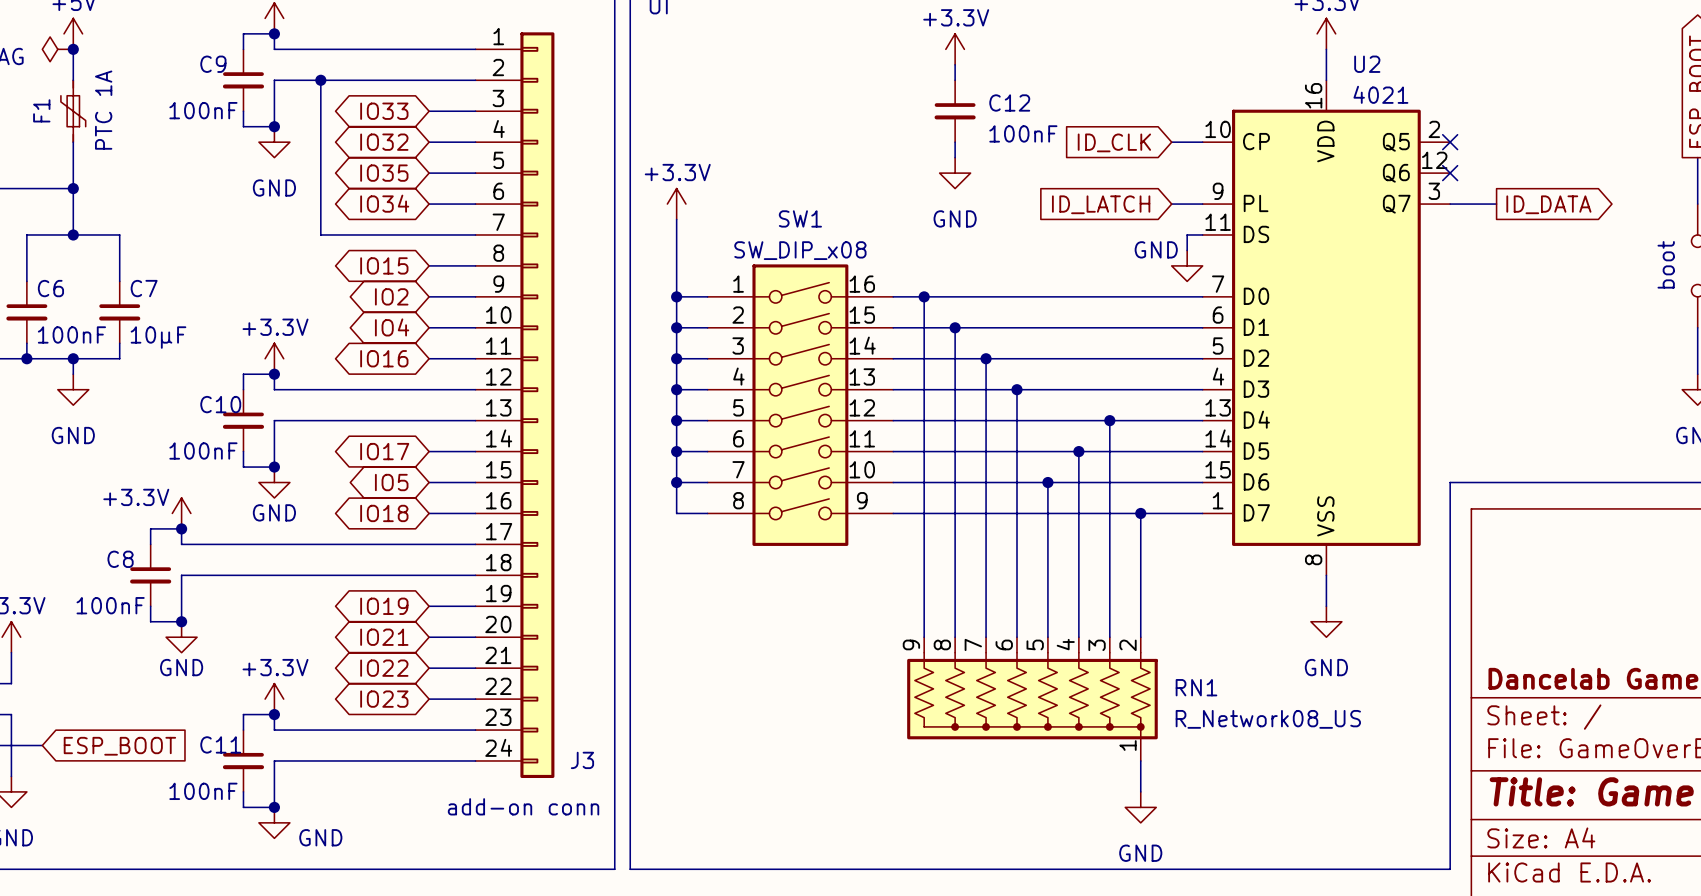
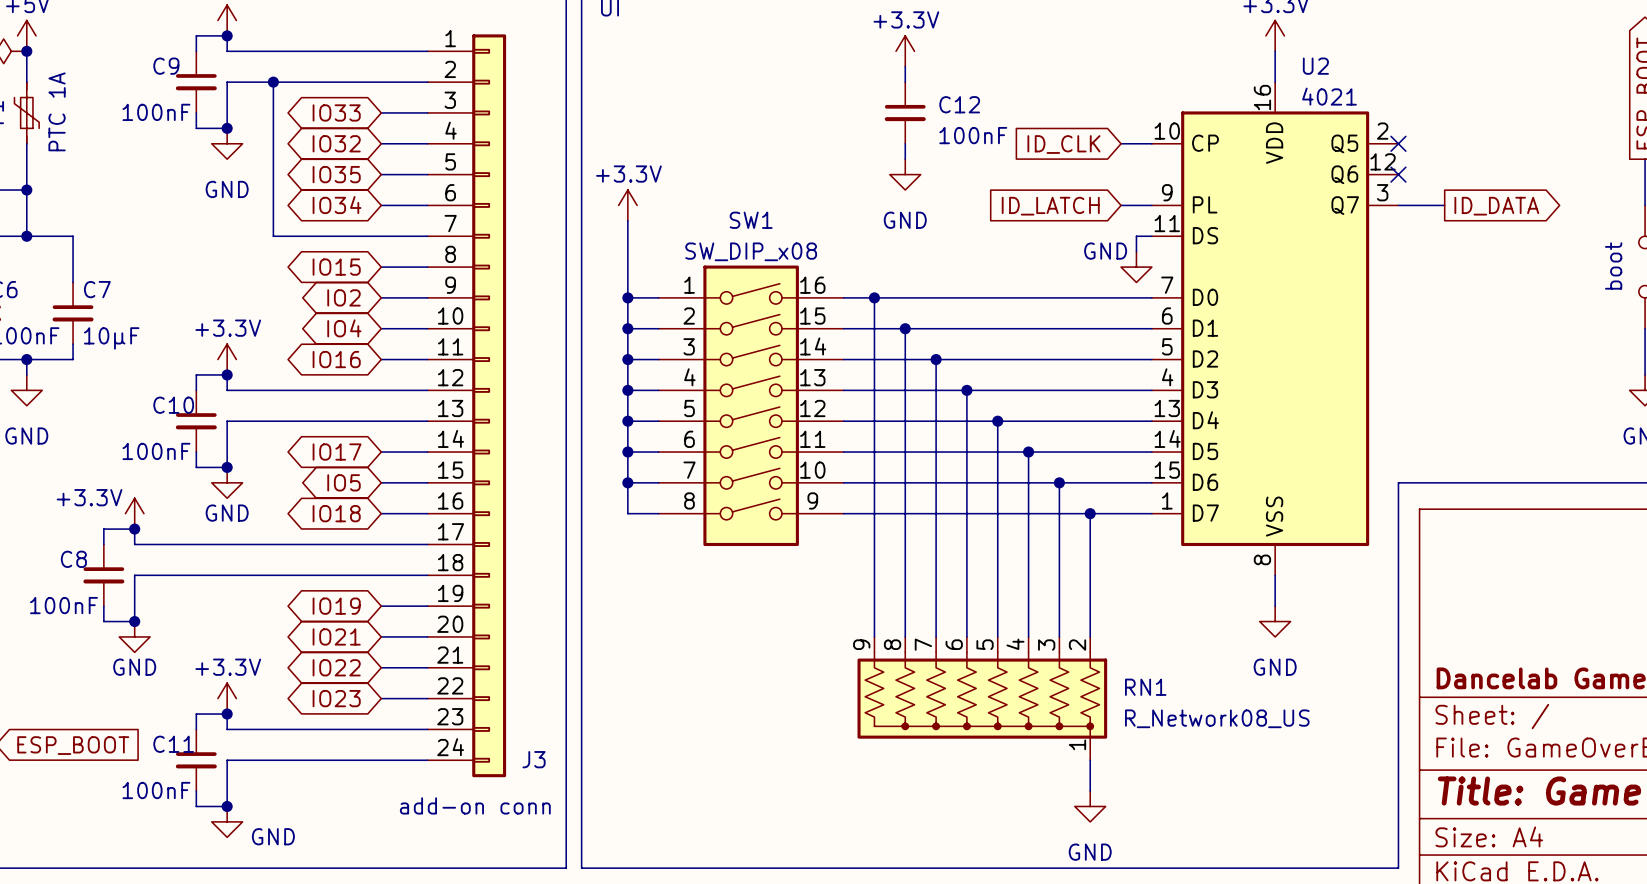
junction: none -> (997, 421)
wire: (1109, 420) (1109, 482) -> (997, 421) (997, 482)
junction: (1109, 420) -> none
junction: (1047, 482) -> none
junction: none -> (1059, 482)

